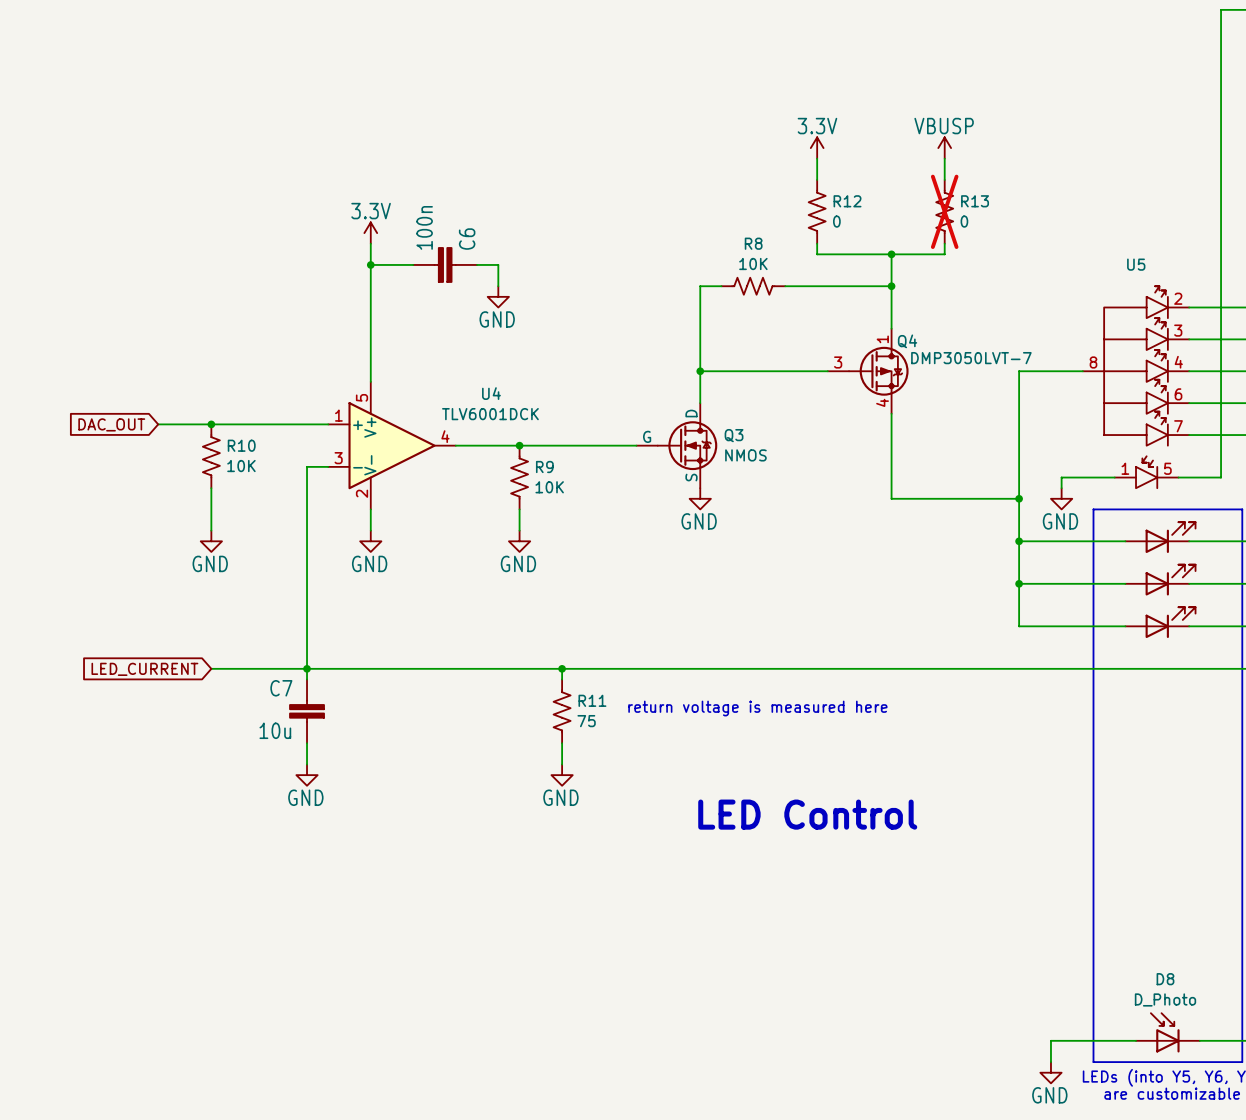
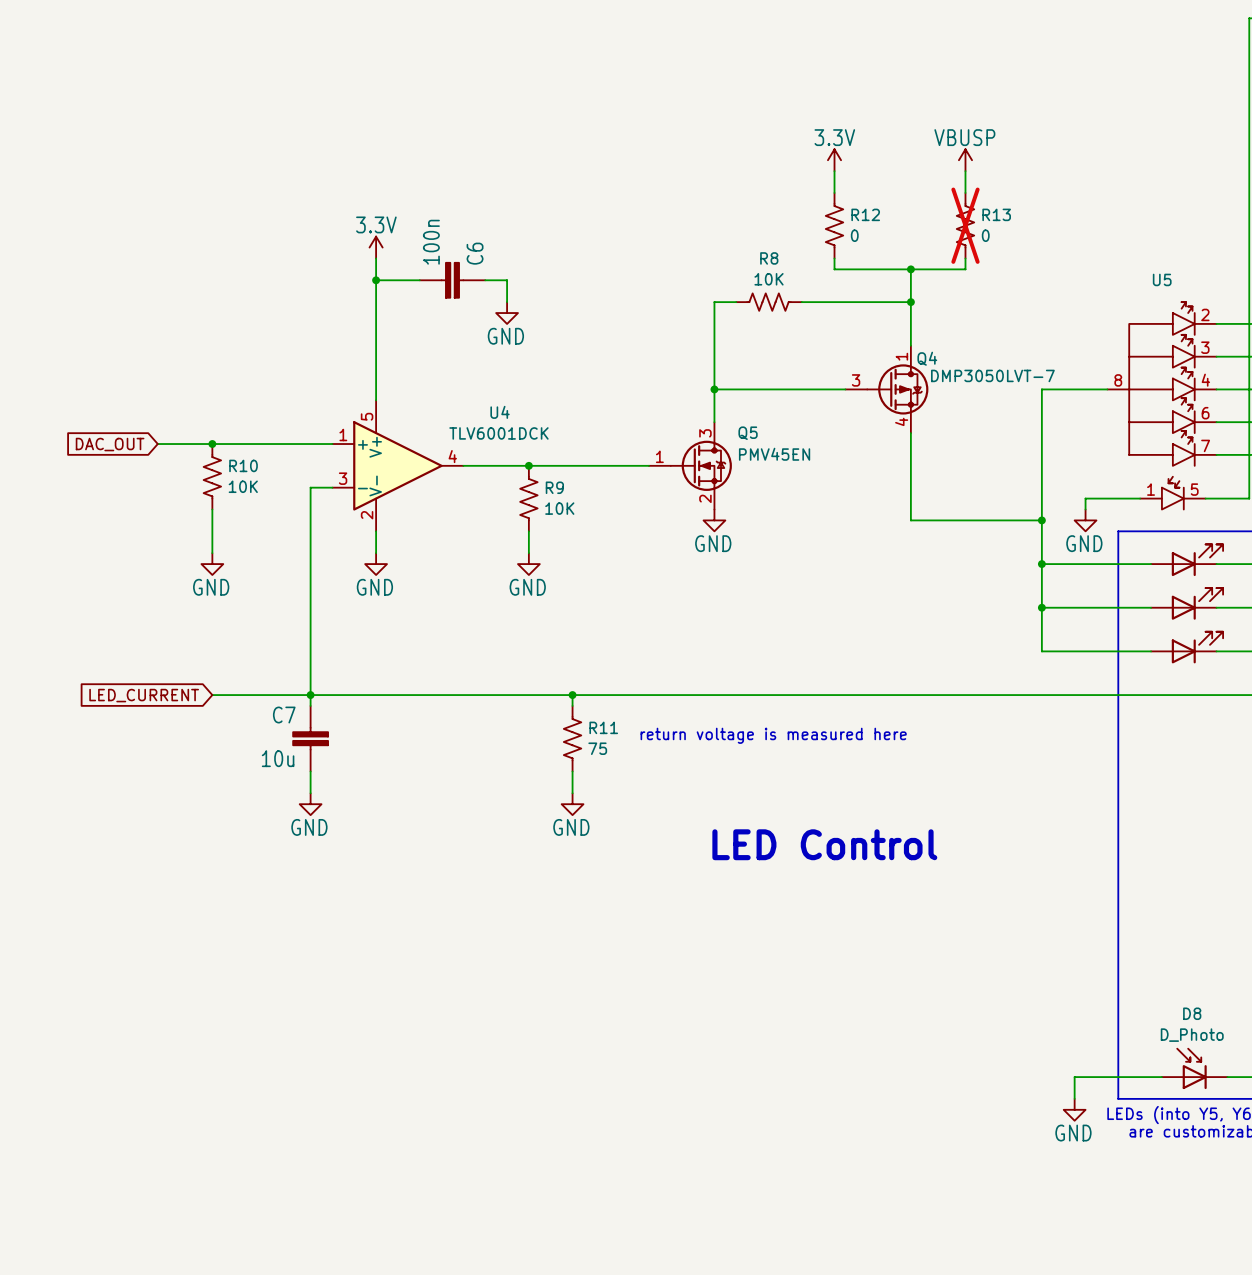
Q3 pin name: D (691, 413) -> none
Q3 pin number: none -> 3 (705, 433)
Q3 name: Q3 (734, 435) -> Q5 (748, 433)
Q3 pin name: G (647, 436) -> none
Q3 pin number: none -> 1 (659, 456)
Q3 value: NMOS (745, 455) -> PMV45EN (774, 454)
Q3 pin name: S (691, 477) -> none
Q3 pin number: none -> 2 (705, 498)

